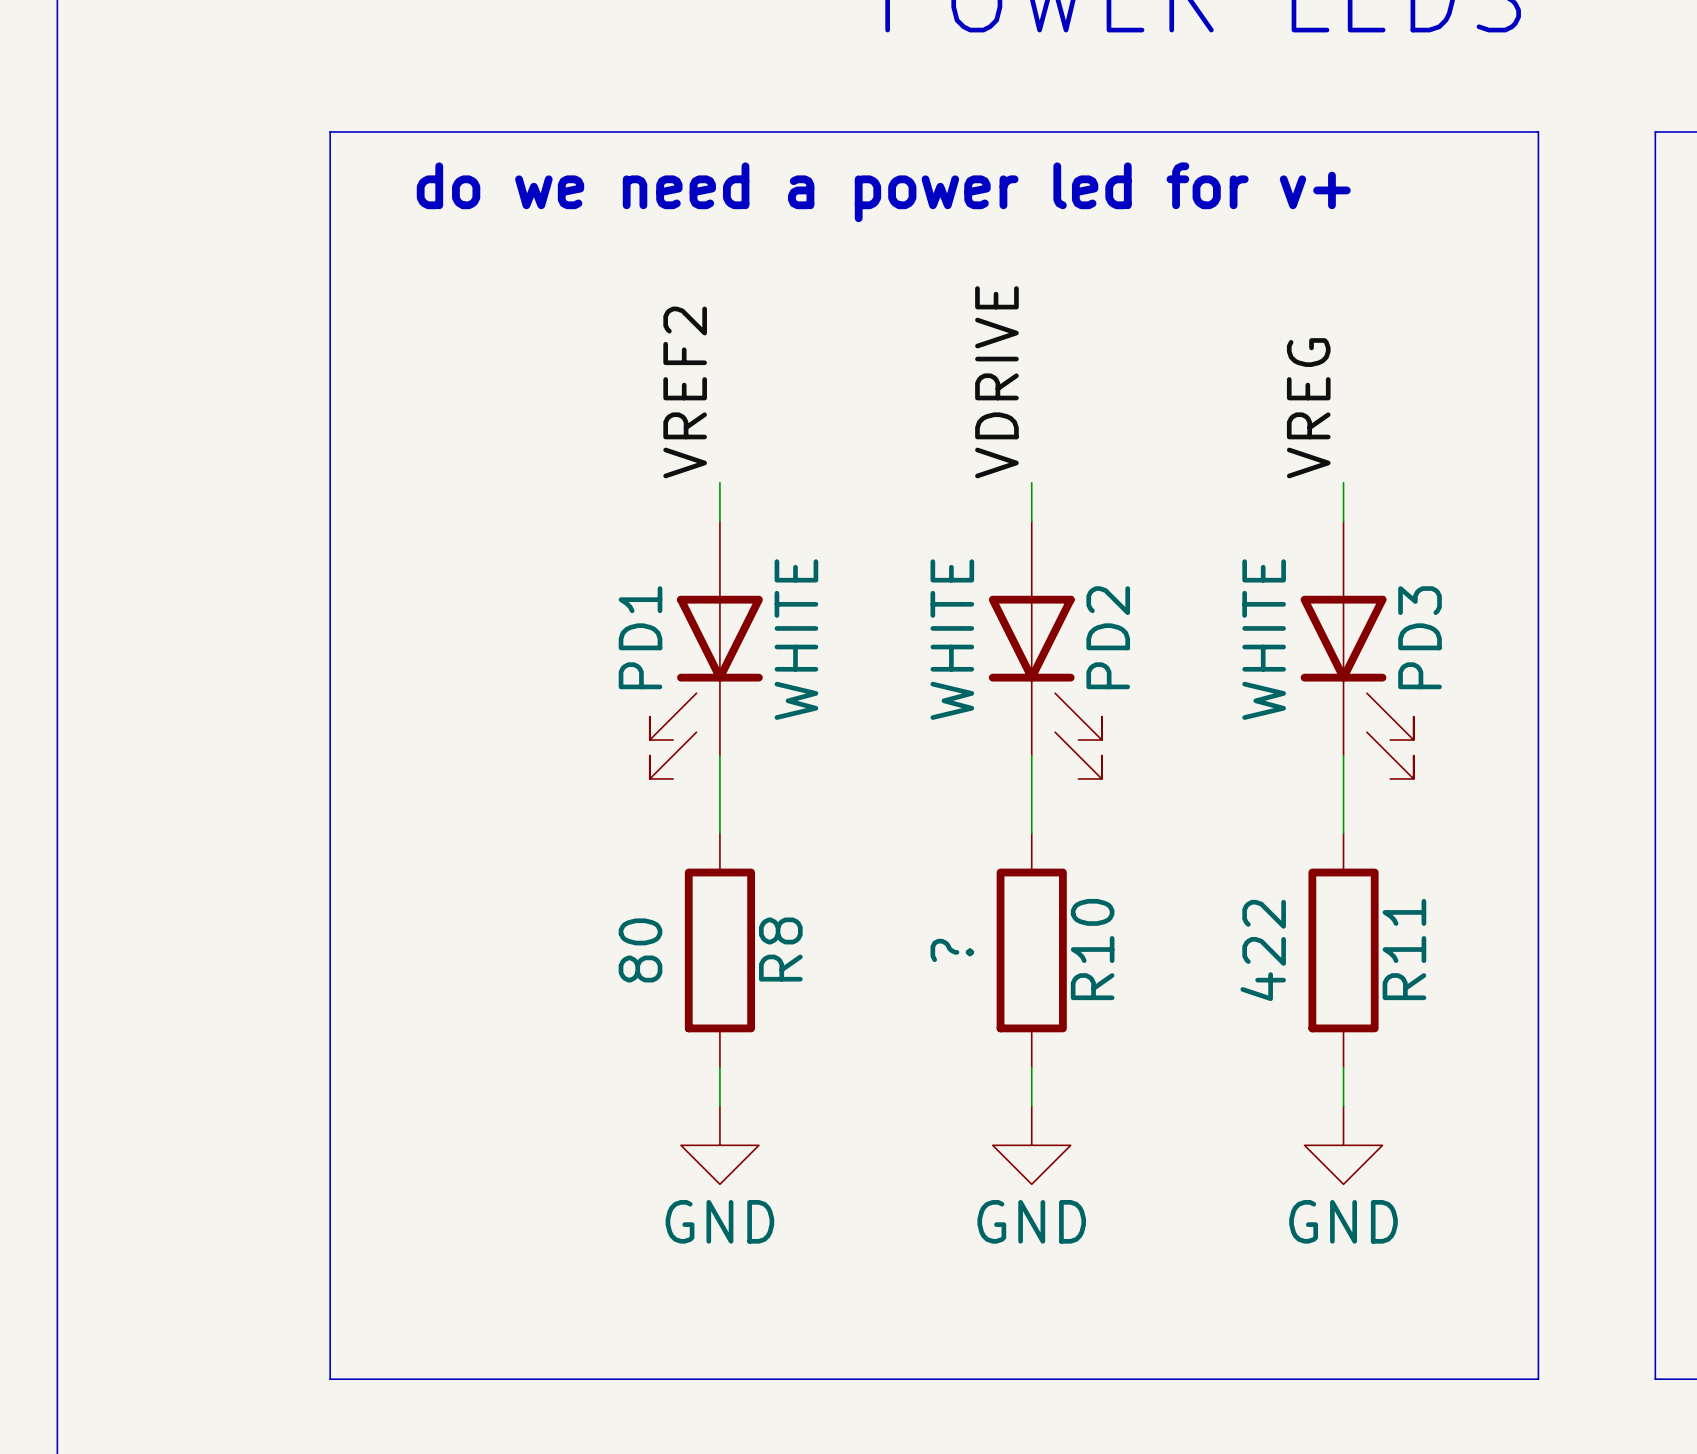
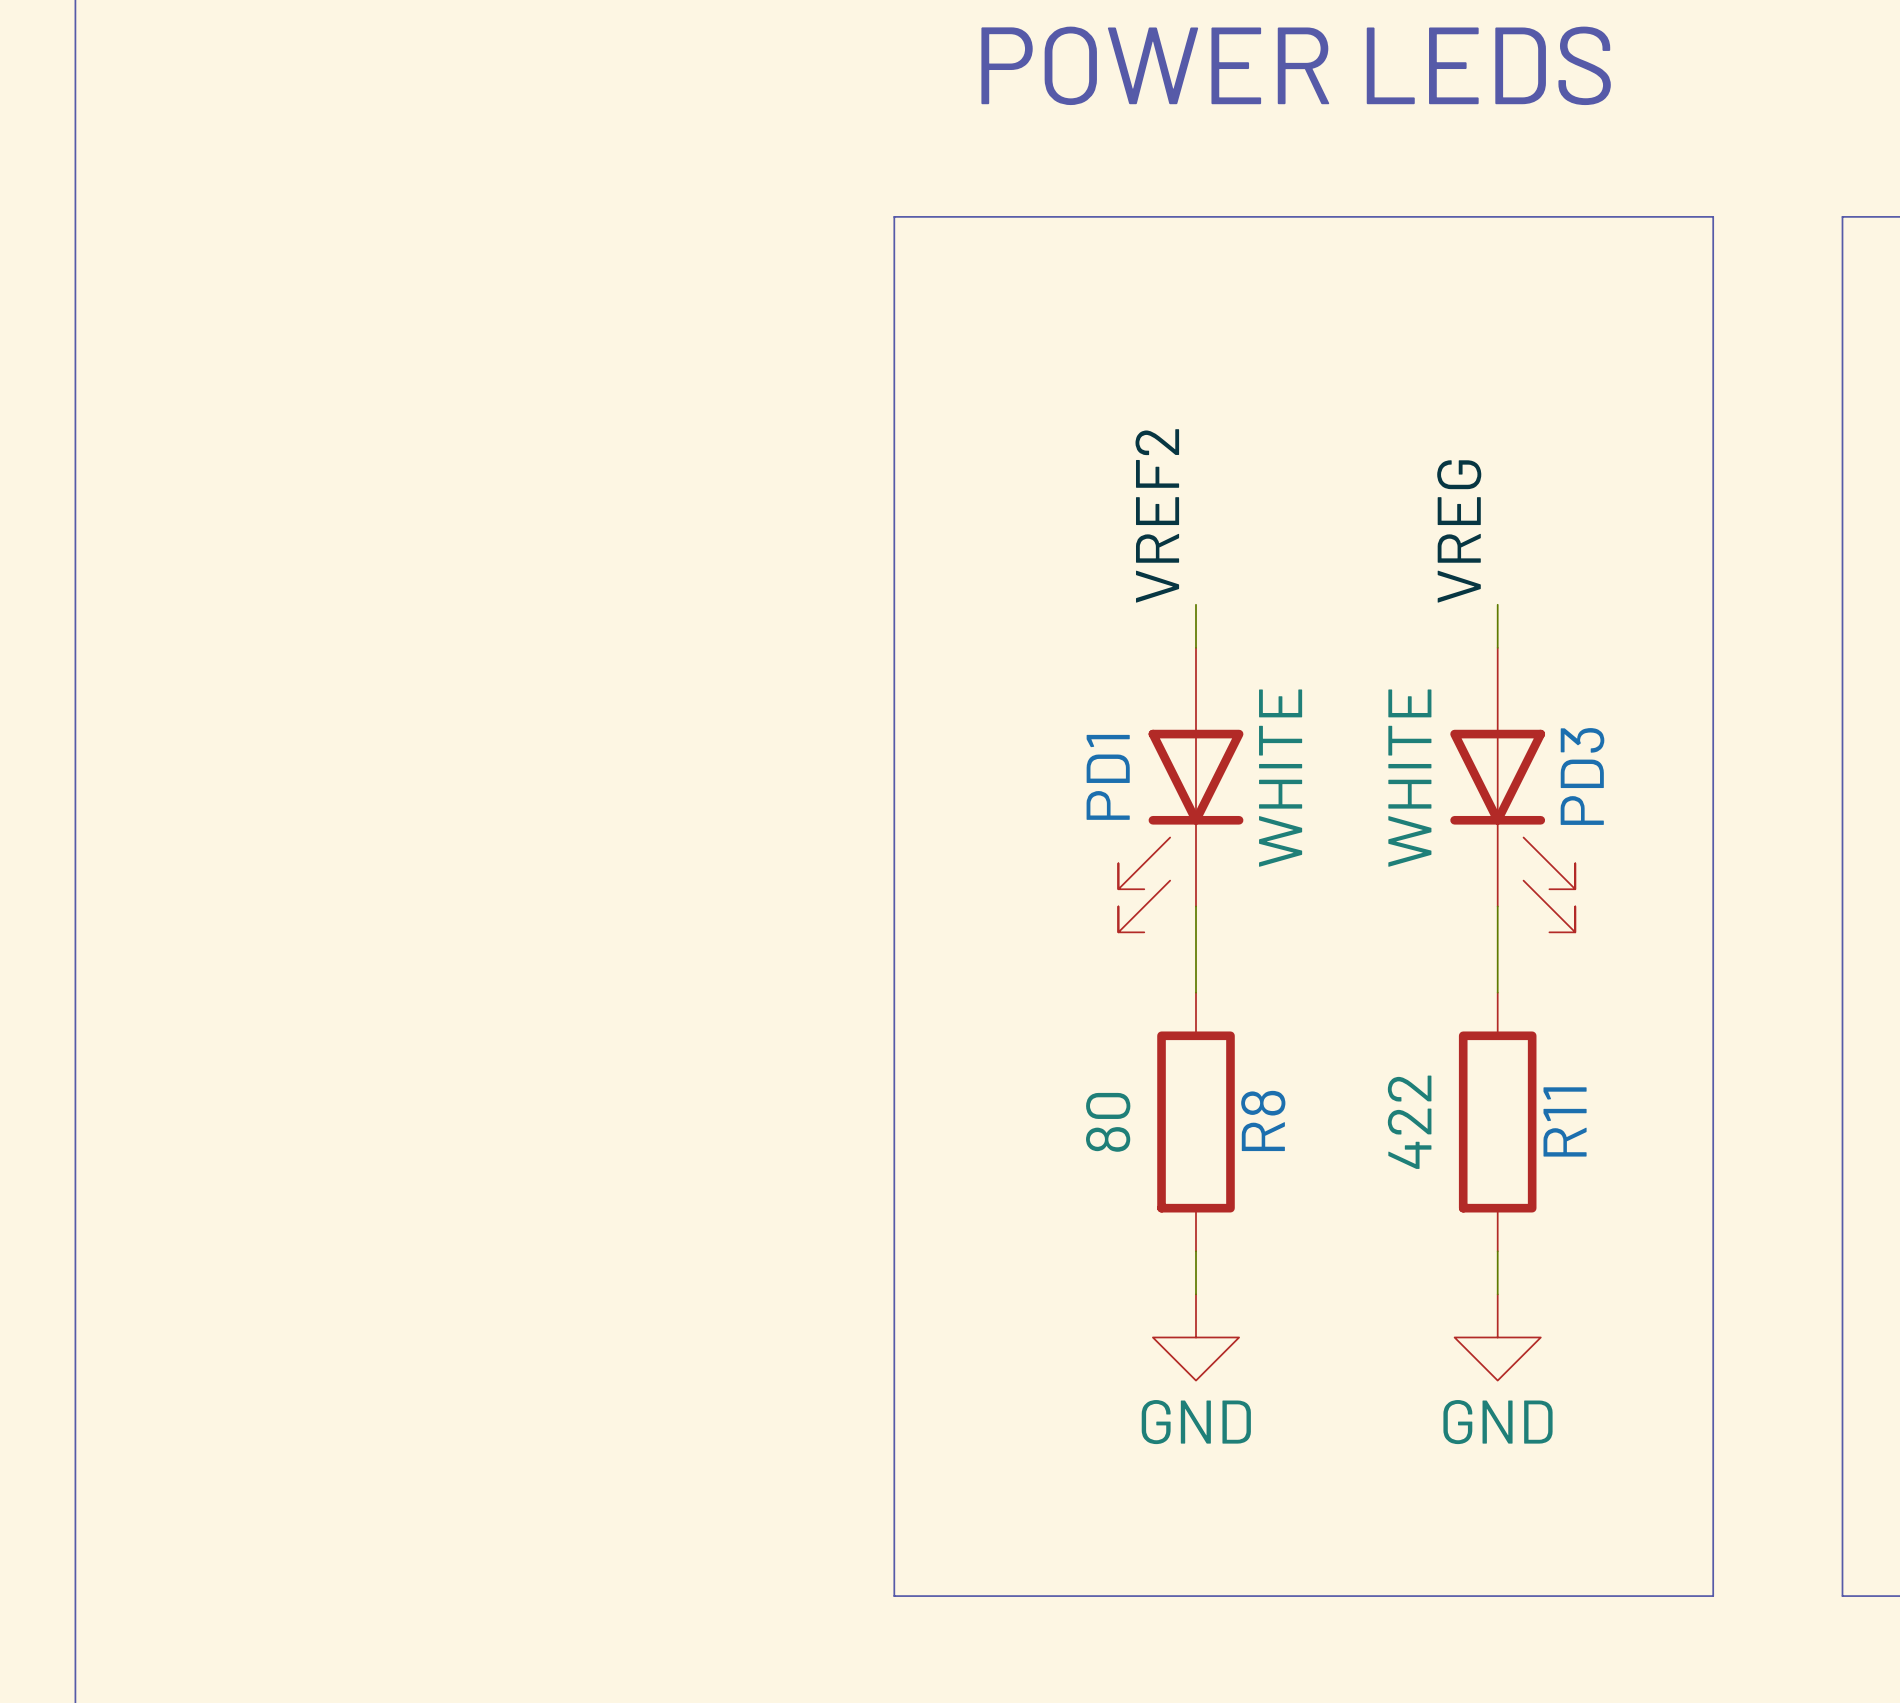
line: (797, 131) (330, 131) (330, 1379) (797, 1379) -> (894, 216) (894, 1596)
text: do we need a power led for v+ (883, 192) -> none
label: VDRIVE (996, 382) -> none
label position: VREF2 (685, 392) -> VREF2 (1157, 515)
wire: (719, 482) (719, 521) -> none
wire: (1031, 482) (1031, 521) -> (1196, 604) (1196, 647)
PD1 position: (706, 650) -> (1180, 790)
PD2: WHITE (1045, 650) -> none
wire: (719, 755) (719, 833) -> none
wire: (1031, 755) (1031, 833) -> (1196, 906) (1196, 992)
R8 position: (719, 950) -> (1196, 1121)
R10: ? (1031, 950) -> none
wire: (719, 1067) (719, 1106) -> none
wire: (1031, 1067) (1031, 1106) -> (1196, 1251) (1196, 1294)
power symbol: GND (719, 1145) -> none
power symbol position: GND (1031, 1145) -> GND (1196, 1337)

